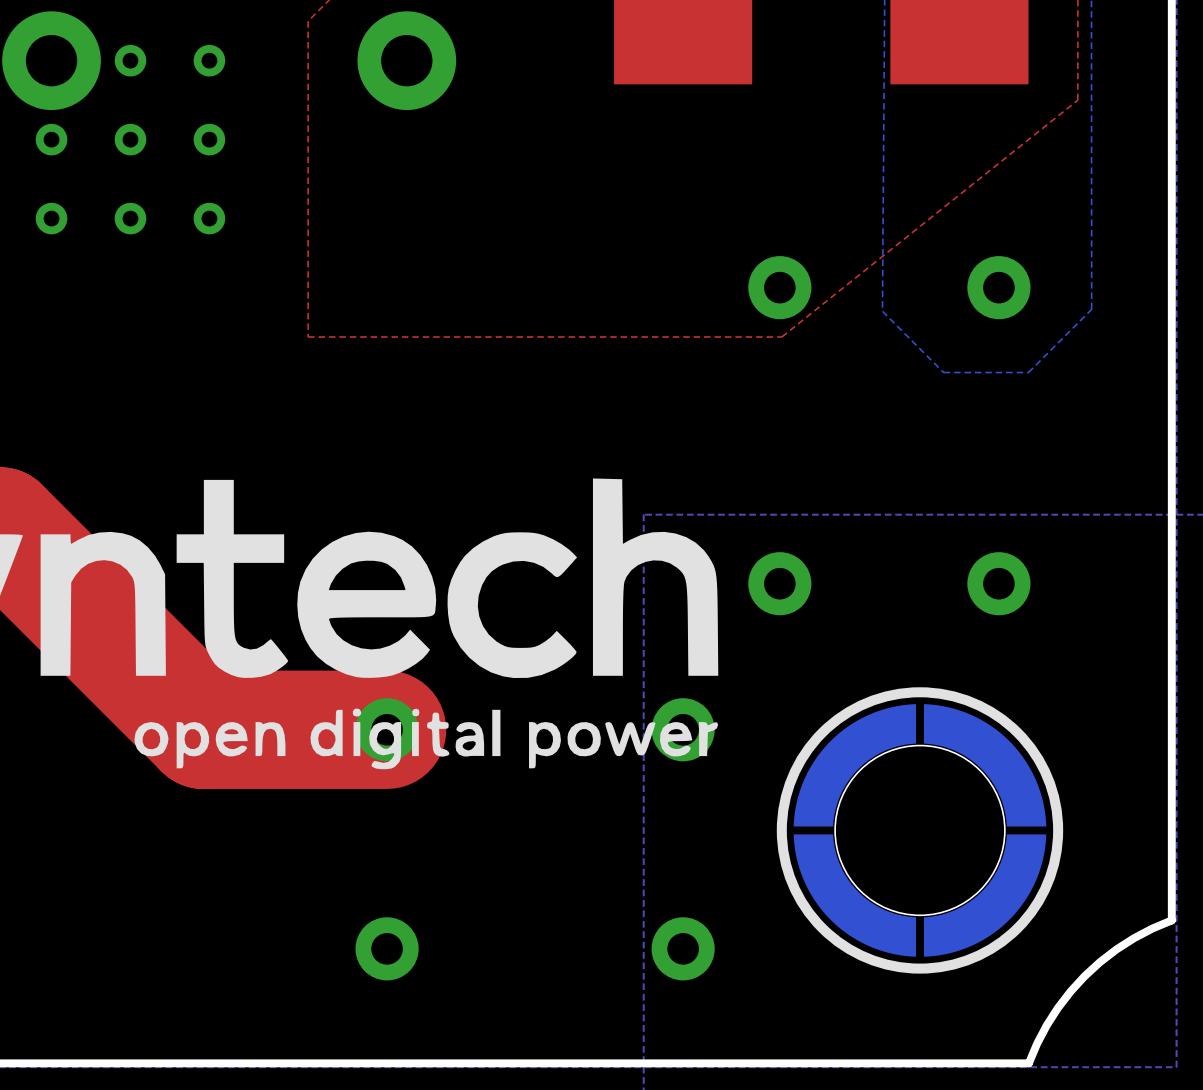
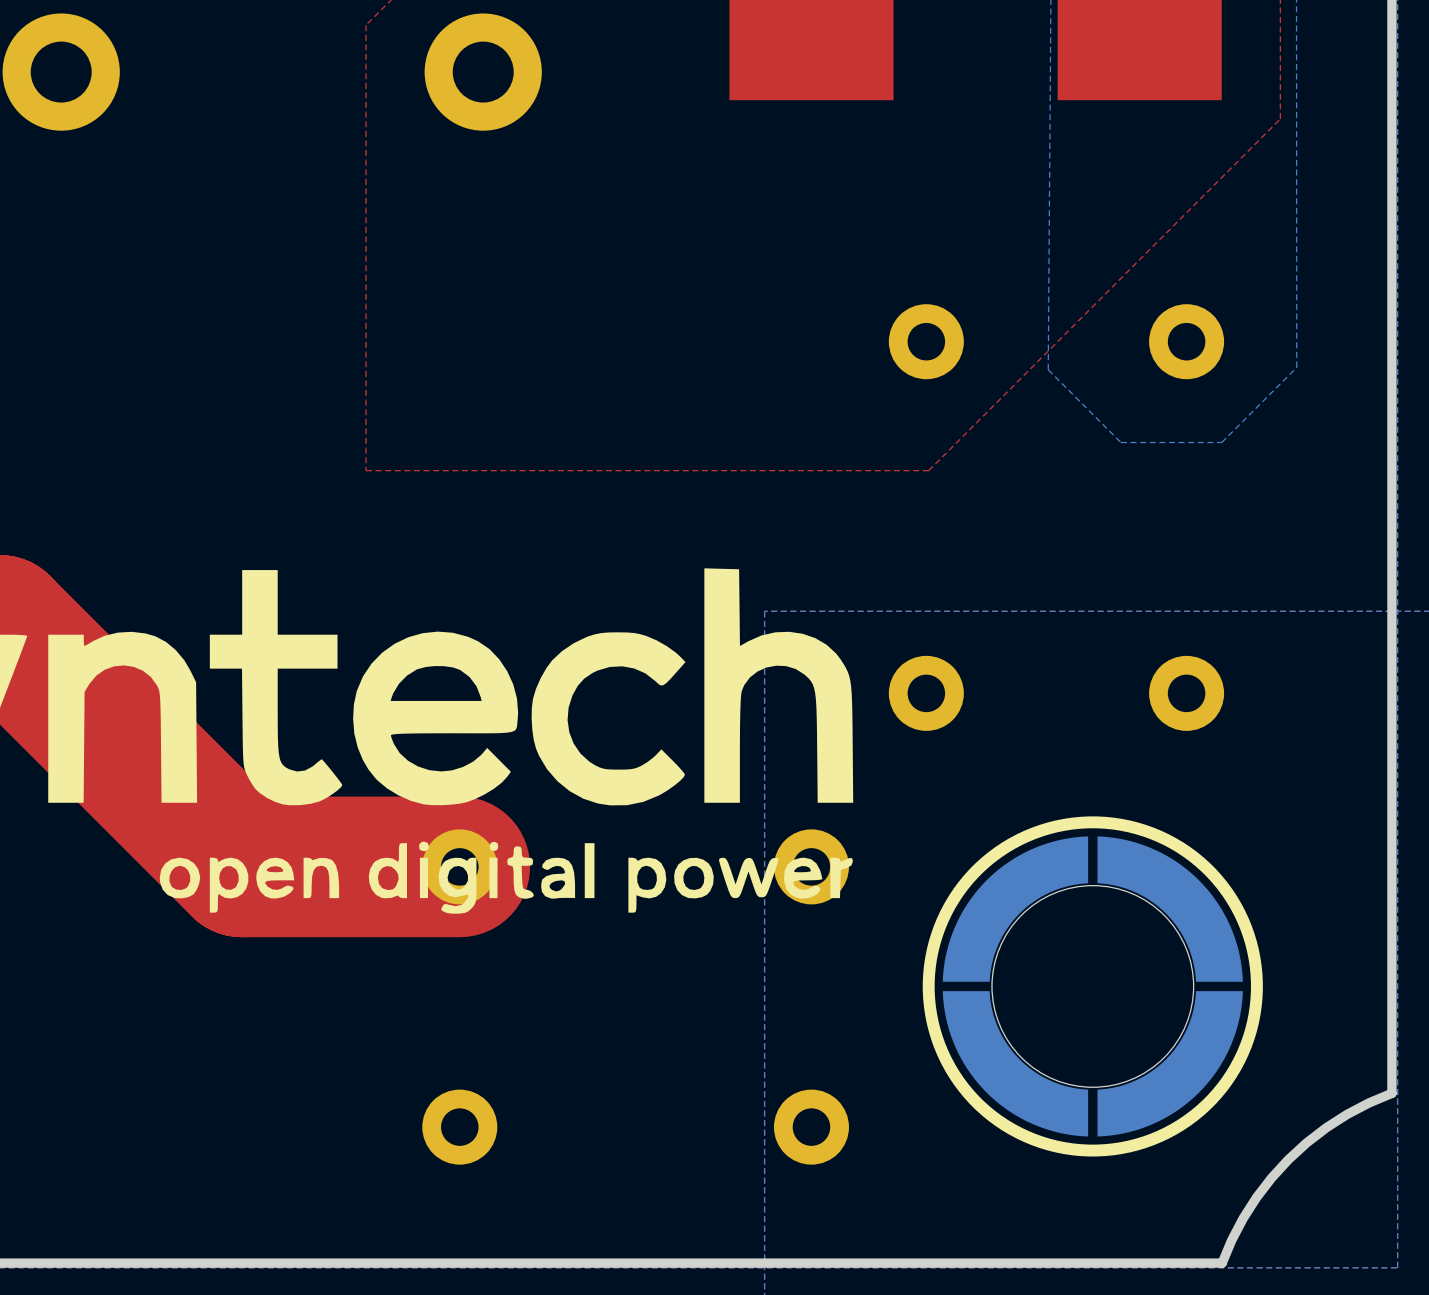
via: (130, 60) -> none
via: (209, 60) -> none
top zone outline: (1077, 100) (781, 337) (308, 337) -> (1280, 118) (928, 470) (366, 470) (366, 400)
via: (51, 139) -> none
via: (130, 139) -> none
via: (209, 139) -> none
via: (51, 218) -> none
via: (130, 218) -> none
via: (209, 218) -> none

